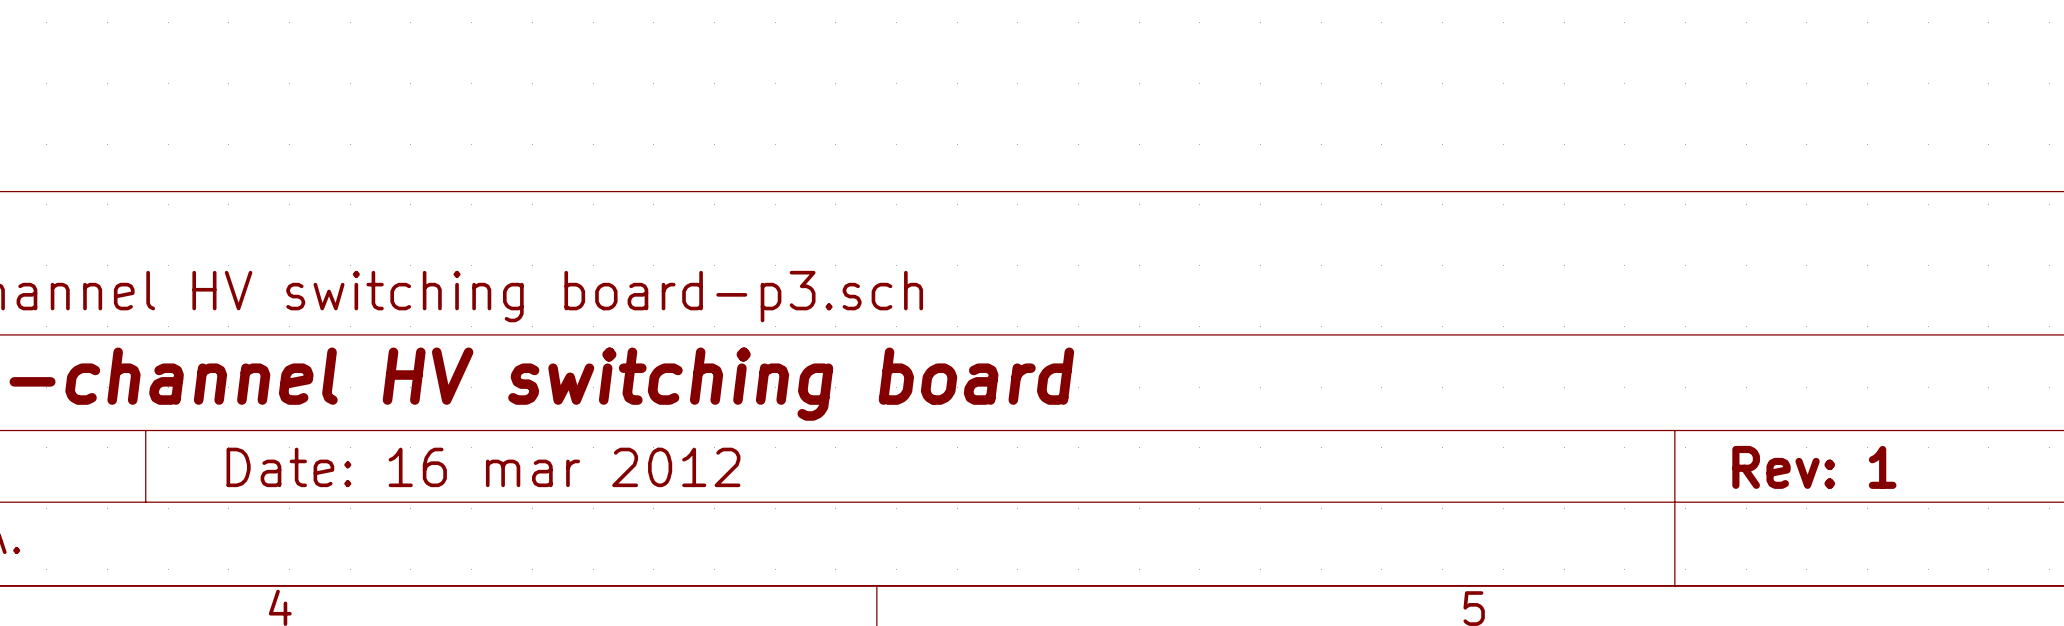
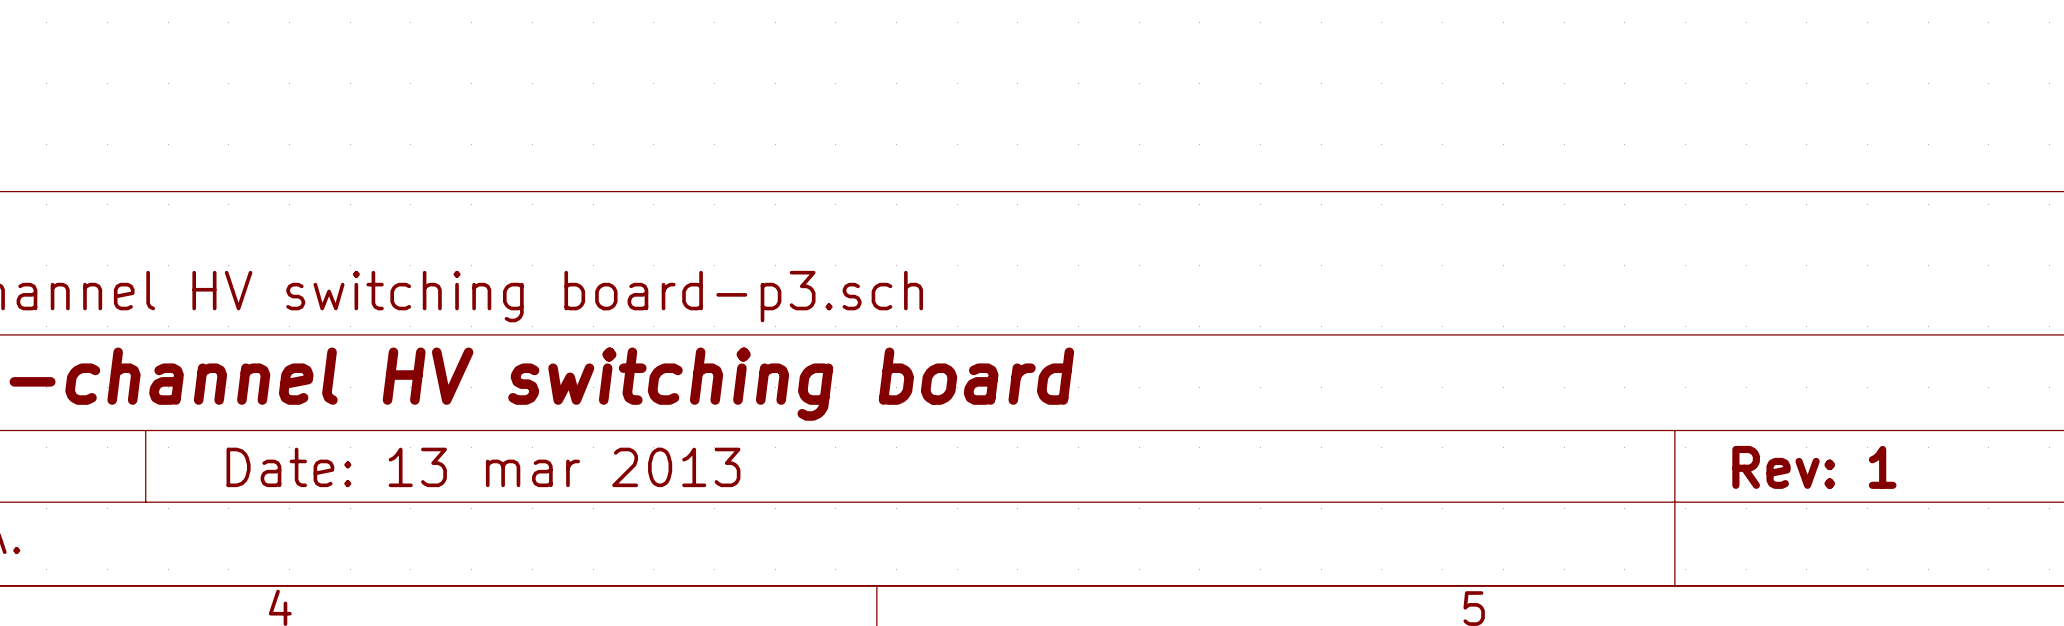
title block: Date: 16 mar 2012 (483, 467) -> Date: 13 mar 2013 (483, 467)

